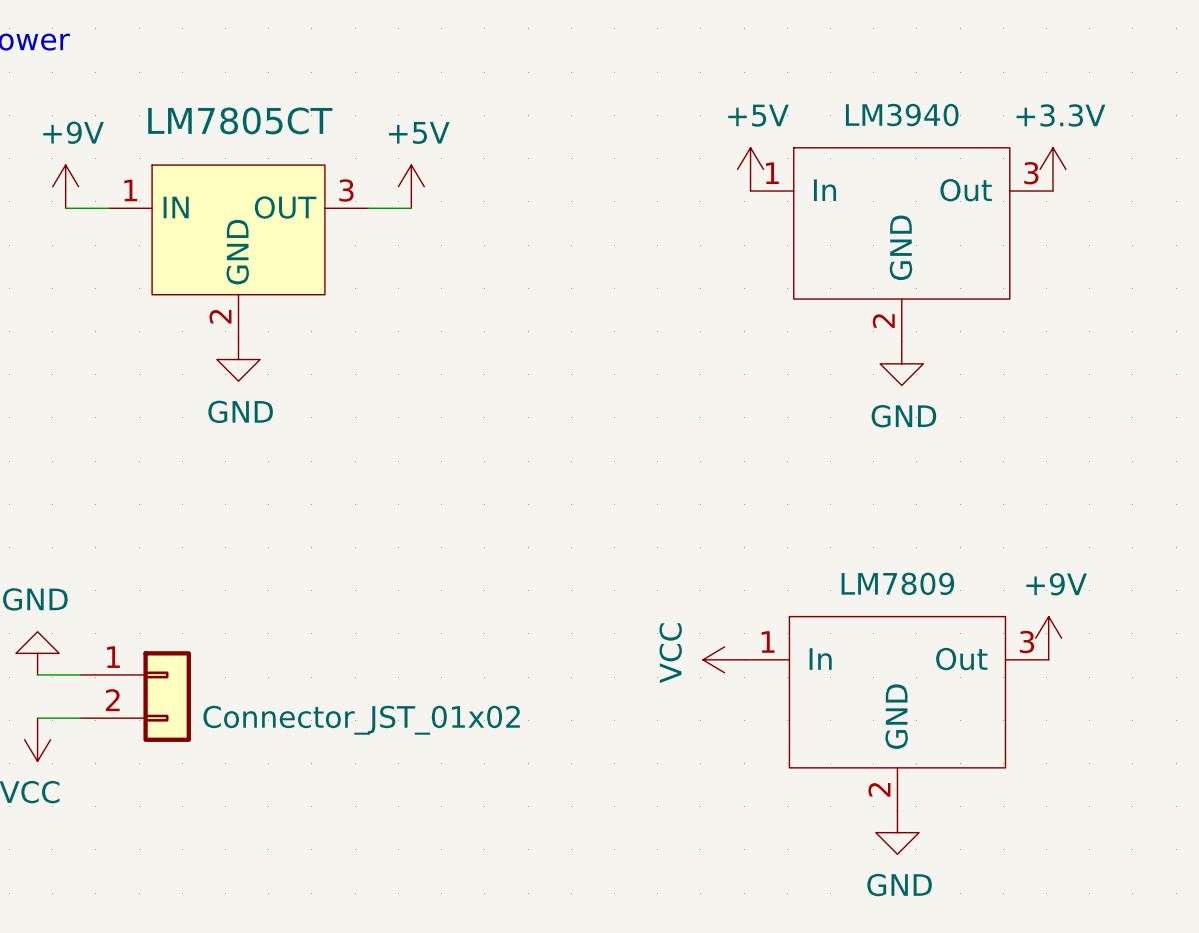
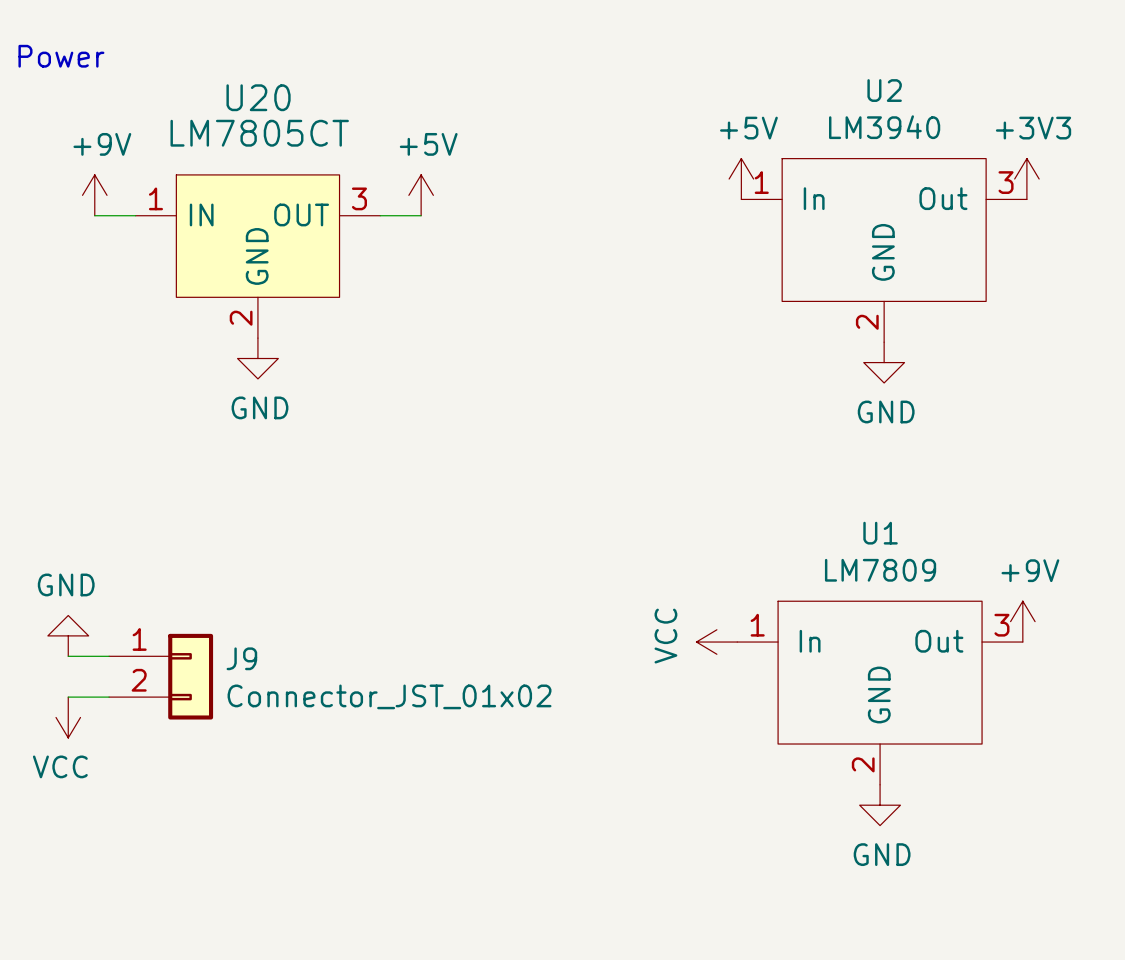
U2 name: none -> U2 (884, 90)
U20 name: none -> U20 (258, 97)
power symbol: +3.3V (1053, 169) -> +3V3 (1026, 179)
U1 name: none -> U1 (880, 533)
J9 name: none -> J9 (241, 658)

